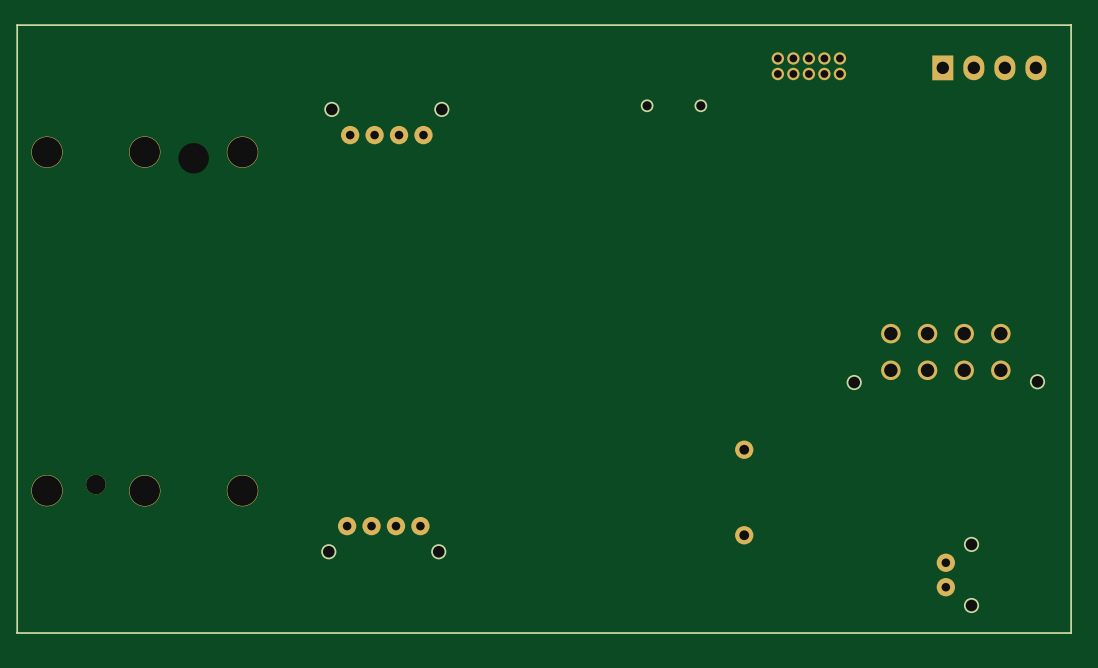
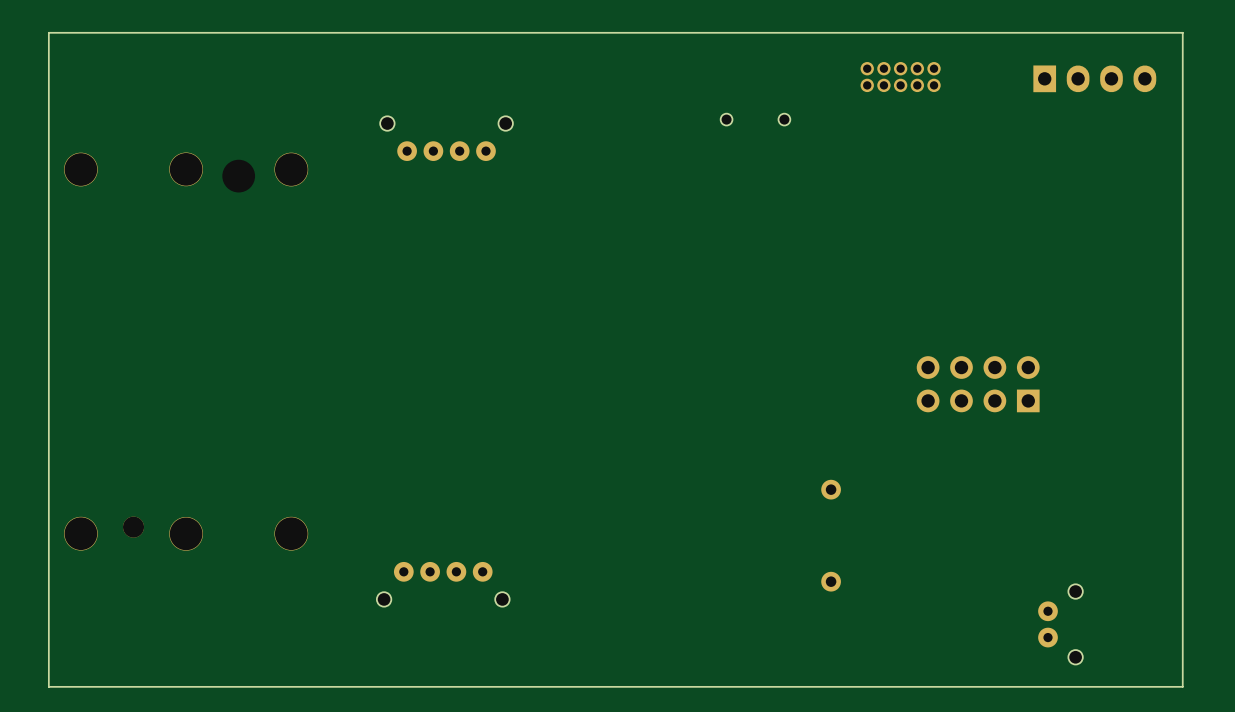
part: none -> (978, 384)
part: (945, 356) -> none

